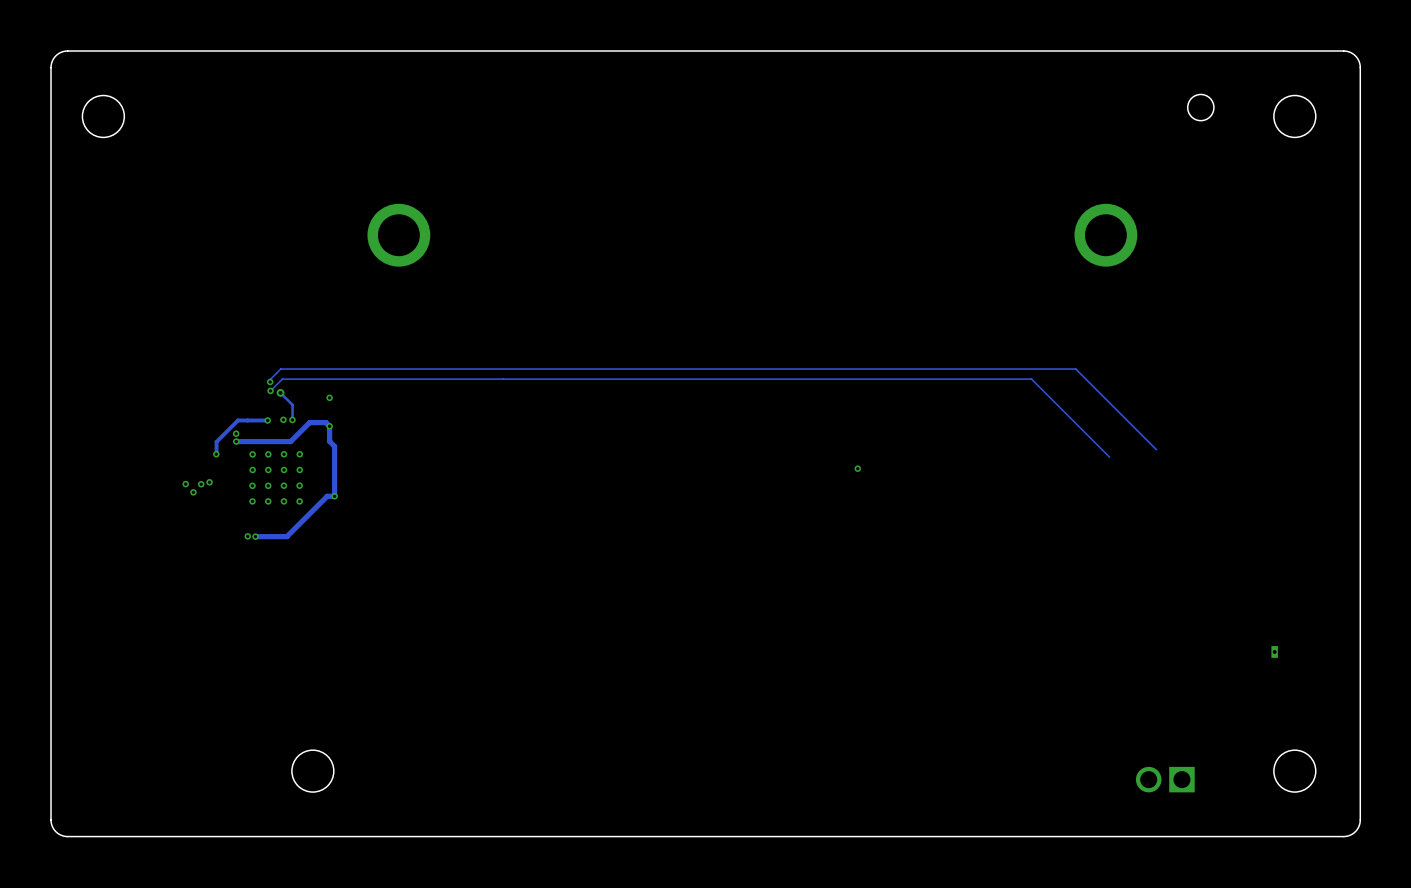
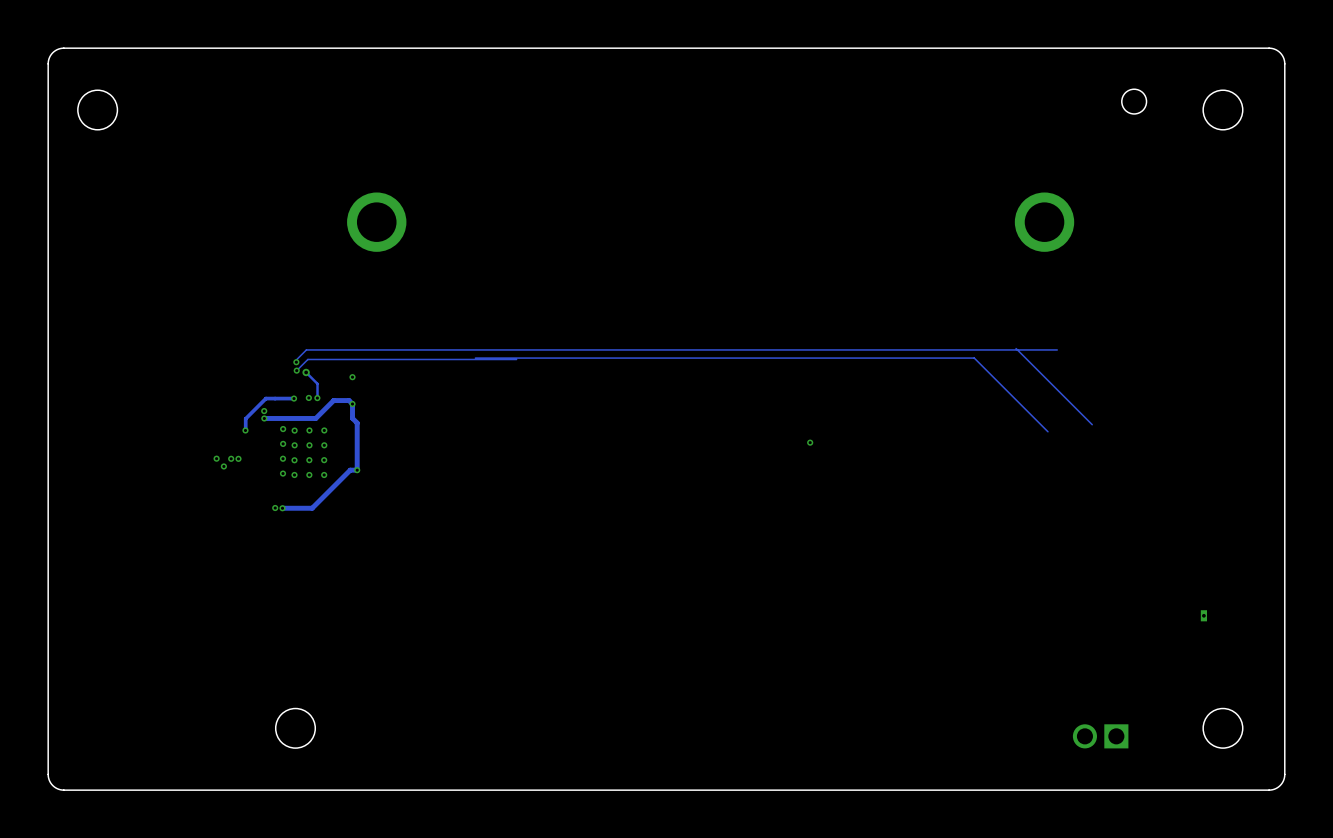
track: (1075, 369) (280, 369) (270, 381) -> none
track: none -> (1057, 349) (306, 349) (296, 359)
track: (503, 379) (282, 379) (270, 390) -> (516, 359) (307, 359) (296, 370)
via: (270, 381) -> none
via: none -> (296, 362)
via: (270, 390) -> none
track: (280, 392) (292, 404) (292, 419) -> (306, 372) (317, 383) (317, 397)
via position: (280, 392) -> (306, 372)
via: none -> (296, 370)
via: (329, 397) -> none
via: none -> (352, 377)
via: (283, 419) -> none
via: (292, 419) -> none
track: (267, 420) (237, 420) (216, 441) (216, 454) -> (294, 398) (265, 398) (245, 418) (245, 430)
via: (267, 420) -> none
via: none -> (294, 398)
via: none -> (308, 397)
via: none -> (317, 398)
via: (329, 426) -> none
via: none -> (352, 404)
via: (236, 433) -> none
via: none -> (264, 411)
track: (236, 441) (290, 441) (309, 422) (325, 422) (329, 426) (329, 441) (334, 446) (334, 496) (327, 496) (286, 536) (255, 536) -> (264, 418) (315, 418) (333, 400) (349, 400) (352, 404) (352, 418) (357, 423) (357, 470) (350, 470) (312, 508) (282, 508)
via: (236, 441) -> none
via: none -> (264, 418)
via: (216, 454) -> none
via: (252, 454) -> none
via: (268, 454) -> none
via: (284, 454) -> none
via: none -> (245, 430)
via: none -> (294, 430)
via: none -> (309, 430)
via: none -> (324, 430)
via: (252, 469) -> none
via: (268, 469) -> none
via: (284, 469) -> none
via: none -> (294, 445)
via: none -> (309, 445)
via: none -> (324, 445)
via: (209, 482) -> none
via: (185, 484) -> none
via: (201, 484) -> none
via: none -> (216, 458)
via: none -> (231, 458)
via: (268, 485) -> none
via: (283, 485) -> none
via: none -> (294, 460)
via: none -> (309, 460)
via: none -> (324, 460)
via: (193, 492) -> none
via: none -> (223, 466)
via: (334, 496) -> none
via: none -> (357, 470)
via: (252, 501) -> none
via: (268, 501) -> none
via: (283, 501) -> none
via: none -> (294, 474)
via: none -> (309, 474)
via: none -> (324, 474)
via: (247, 536) -> none
via: (255, 536) -> none
via: none -> (275, 508)
via: none -> (282, 508)

